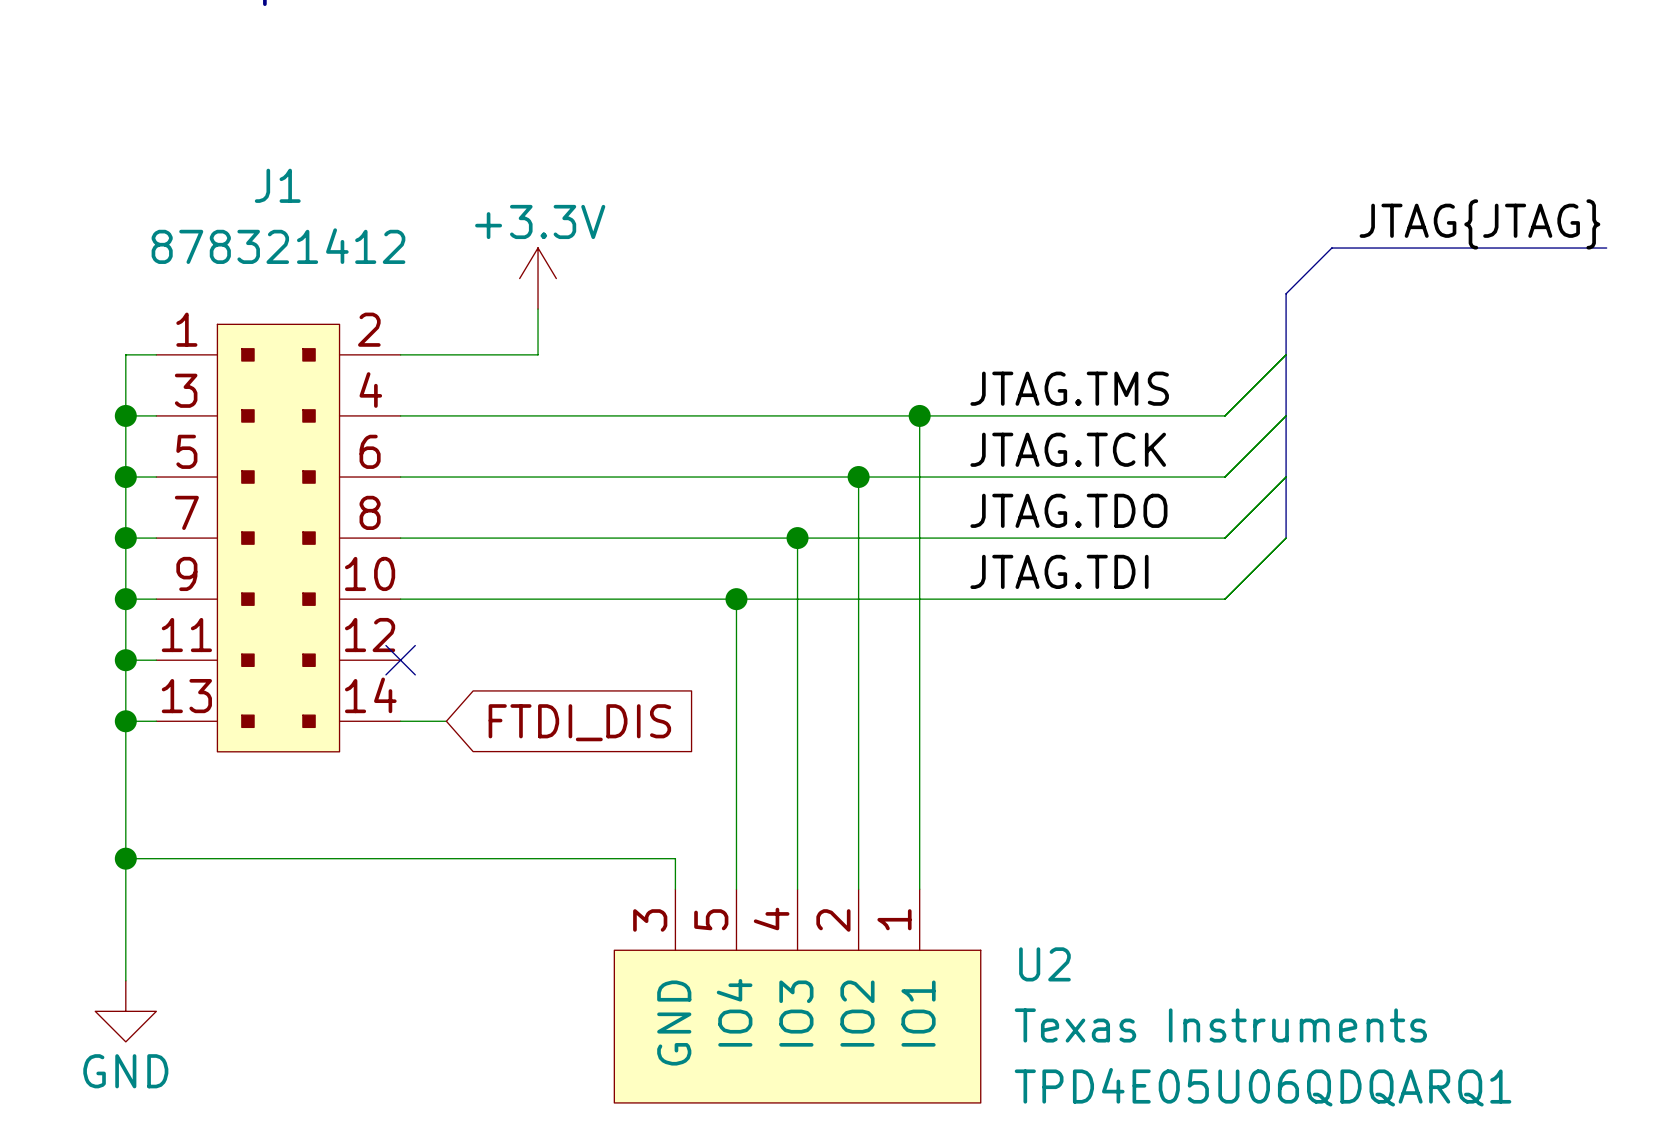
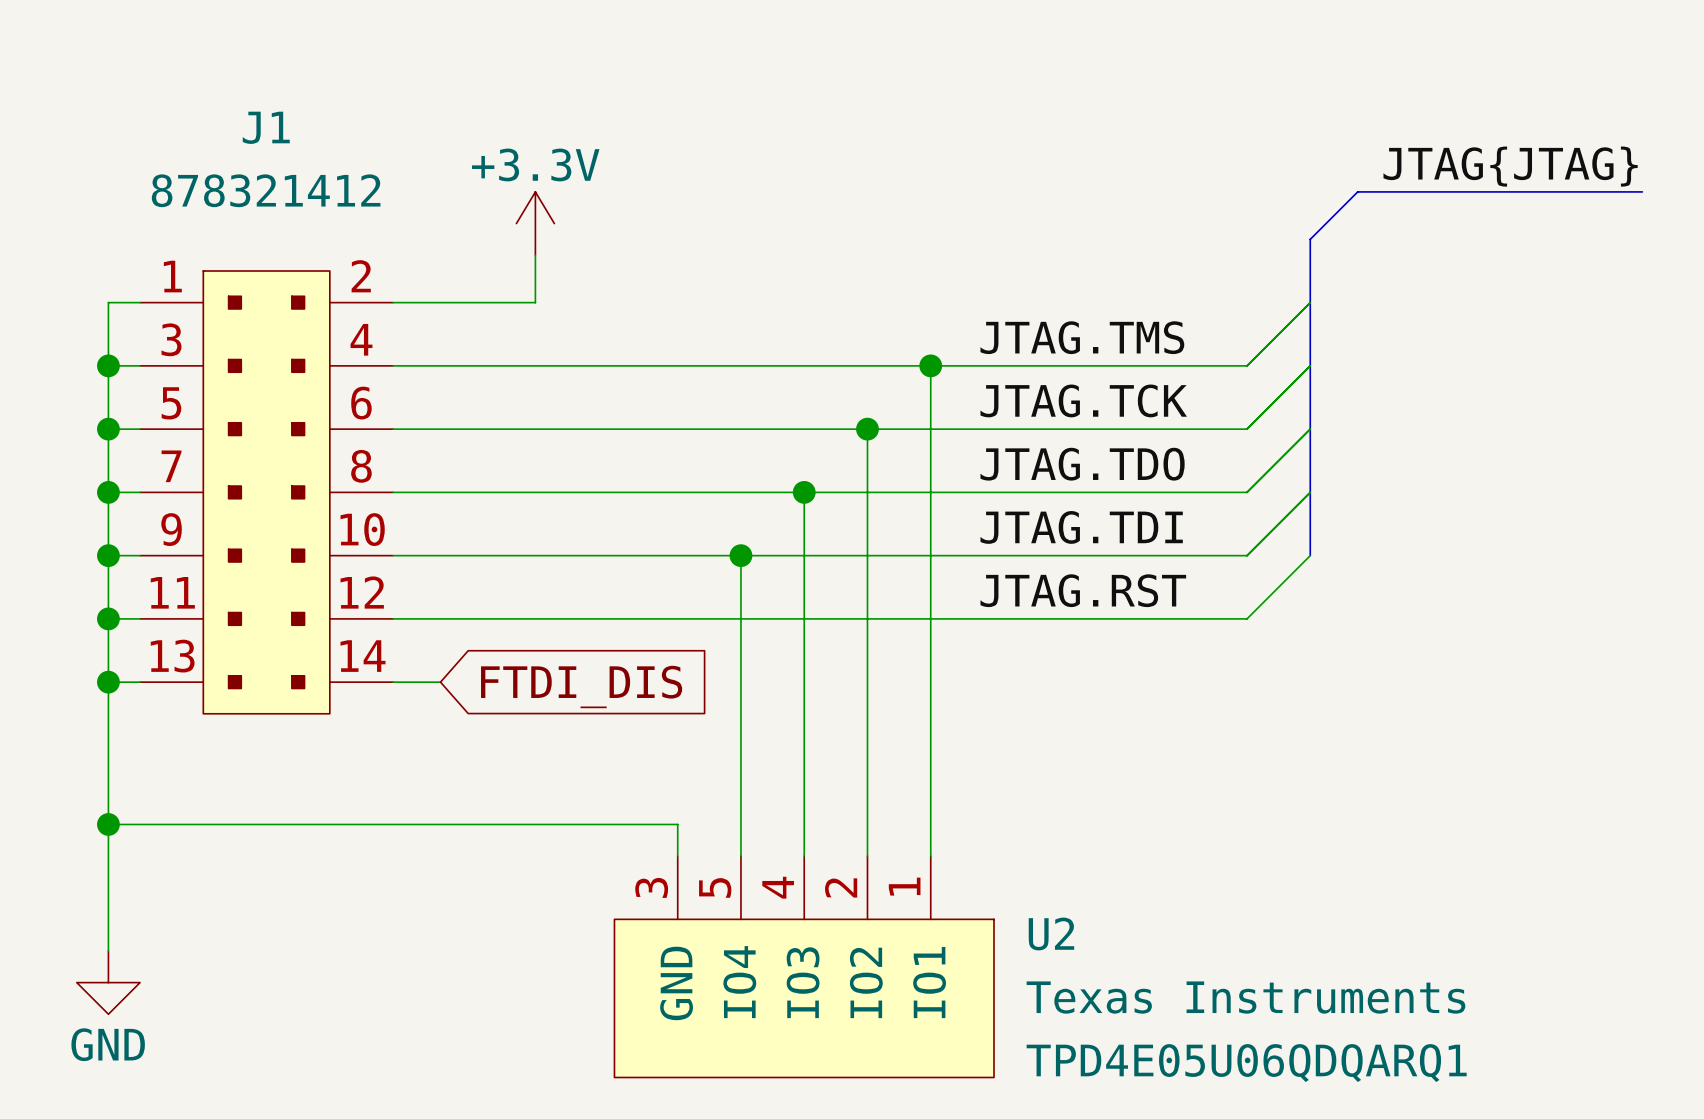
bus: none -> (1310, 492) (1310, 555)
wire: none -> (1310, 555) (1247, 618) (393, 618)
label: none -> JTAG.RST (1083, 590)
no-connect mark: (400, 660) -> none

